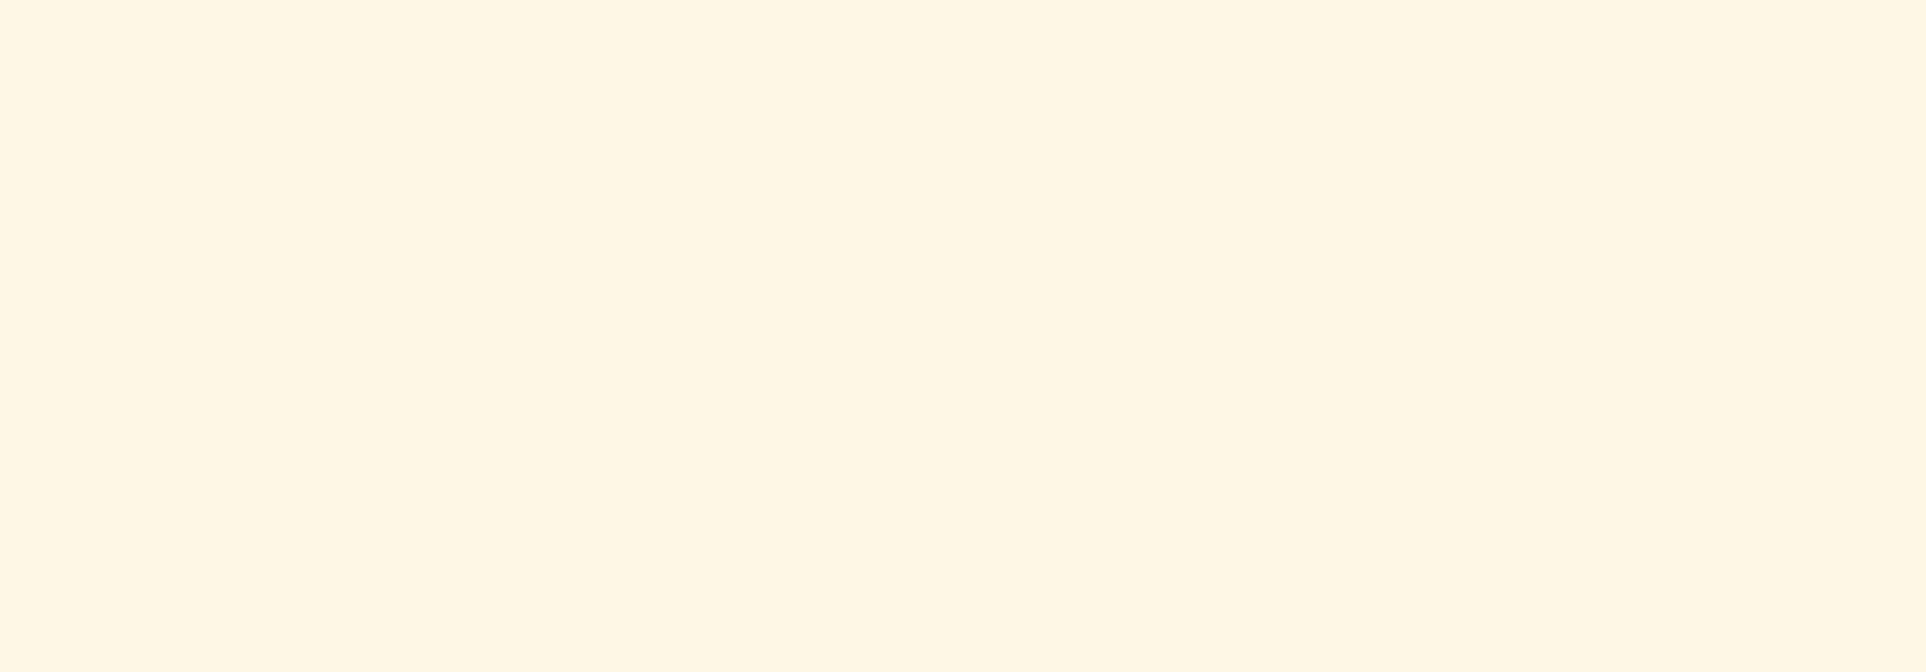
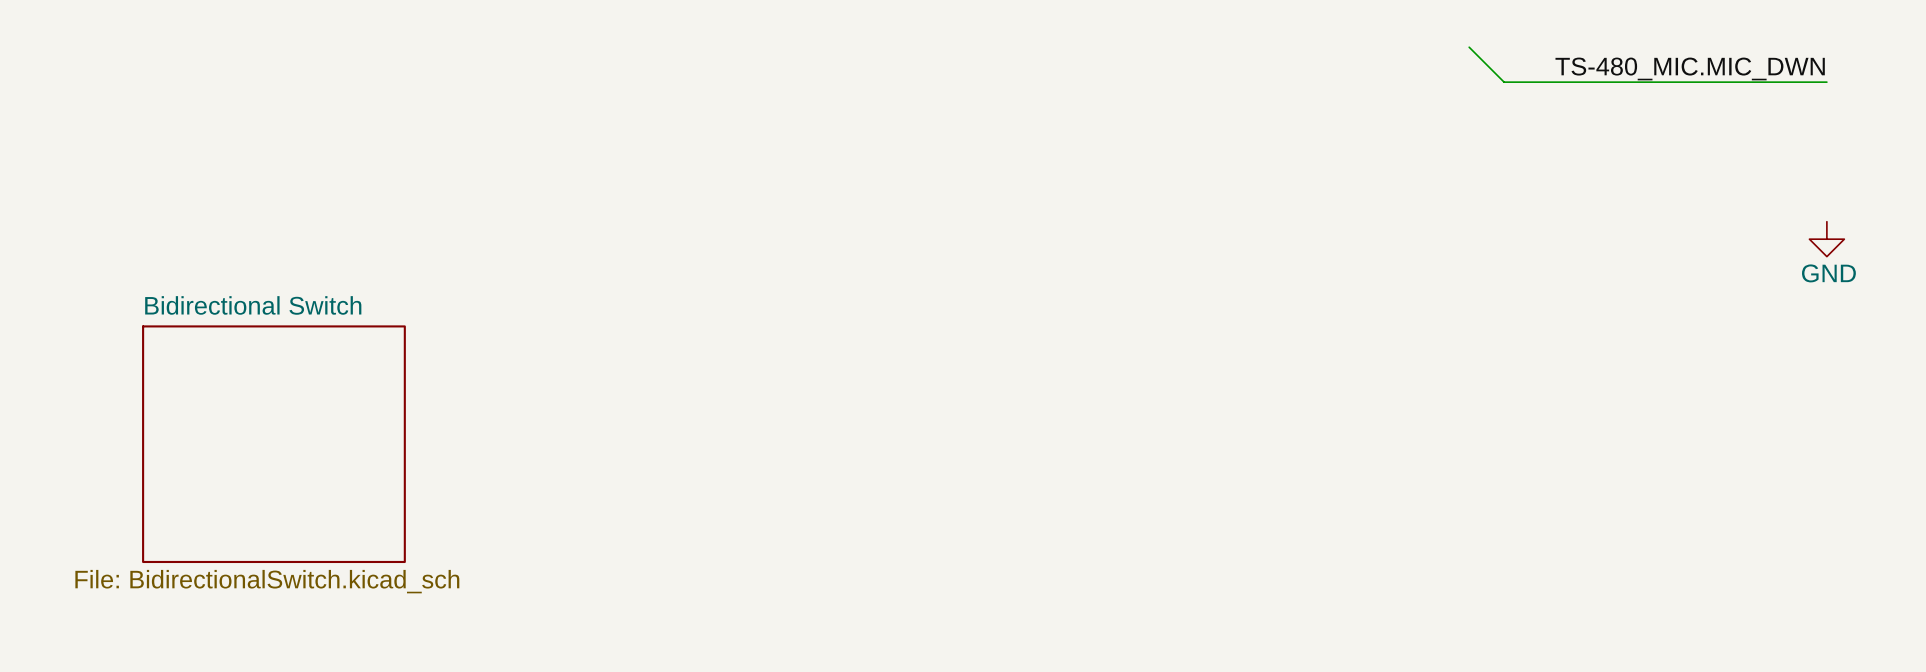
wire: none -> (1469, 47) (1504, 82) (1826, 82)
label: none -> TS-480_MIC.MIC_DWN (1690, 68)
power symbol: none -> GND (1826, 239)
sheet Bidirectional Switch: none -> File: BidirectionalSwitch.kicad_sch (273, 444)

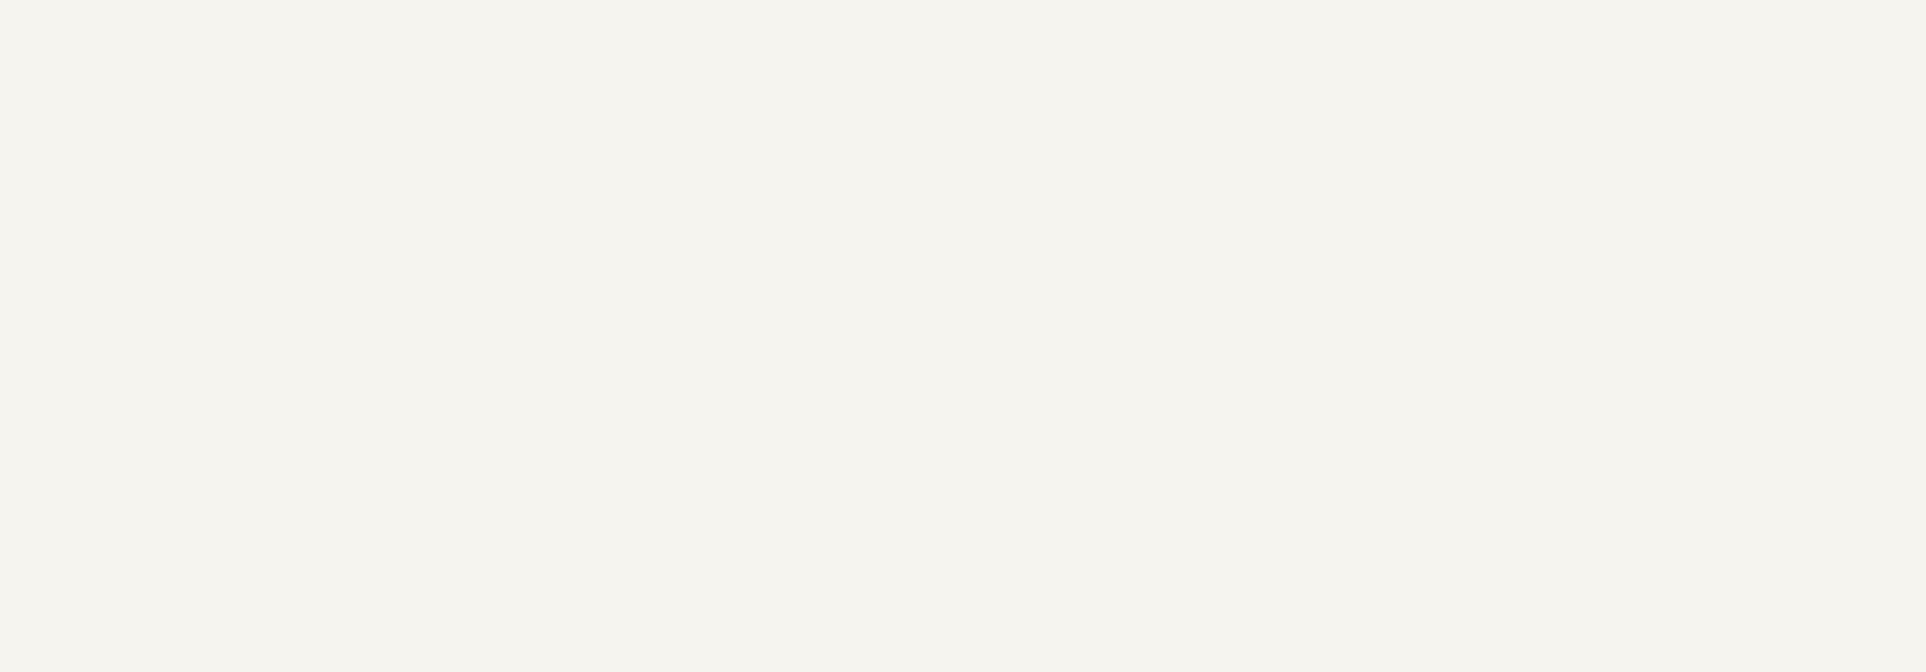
wire: (1469, 47) (1504, 82) (1826, 82) -> none
label: TS-480_MIC.MIC_DWN (1690, 68) -> none
power symbol: GND (1826, 239) -> none
sheet Bidirectional Switch: File: BidirectionalSwitch.kicad_sch (273, 444) -> none

